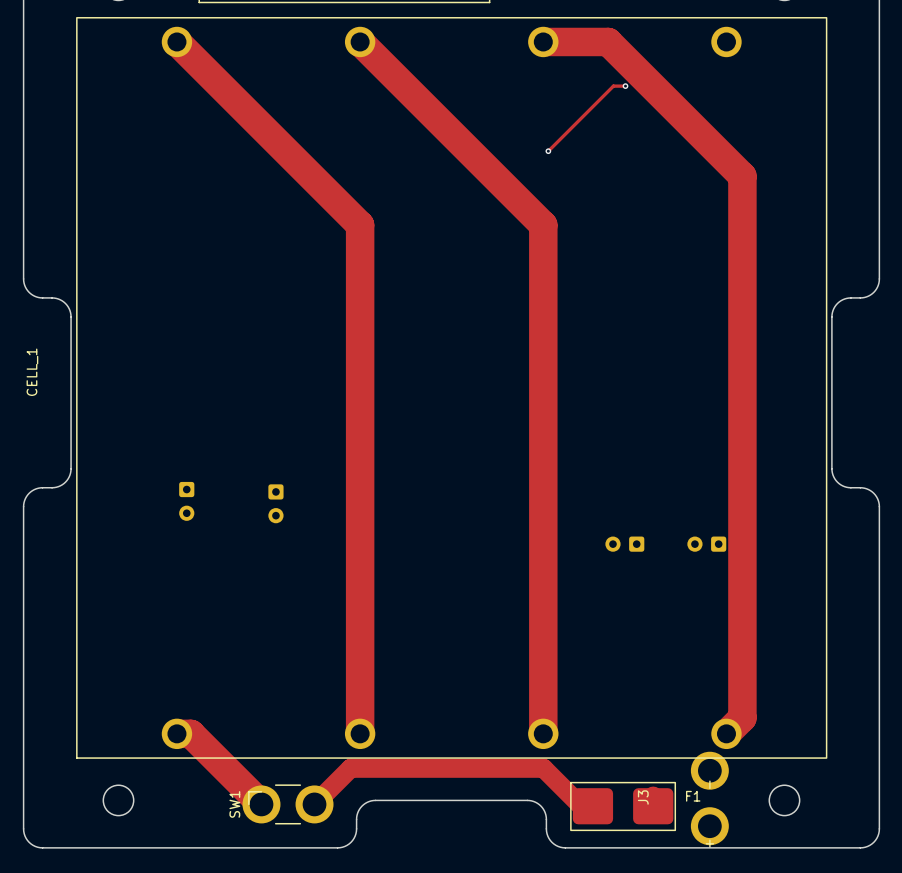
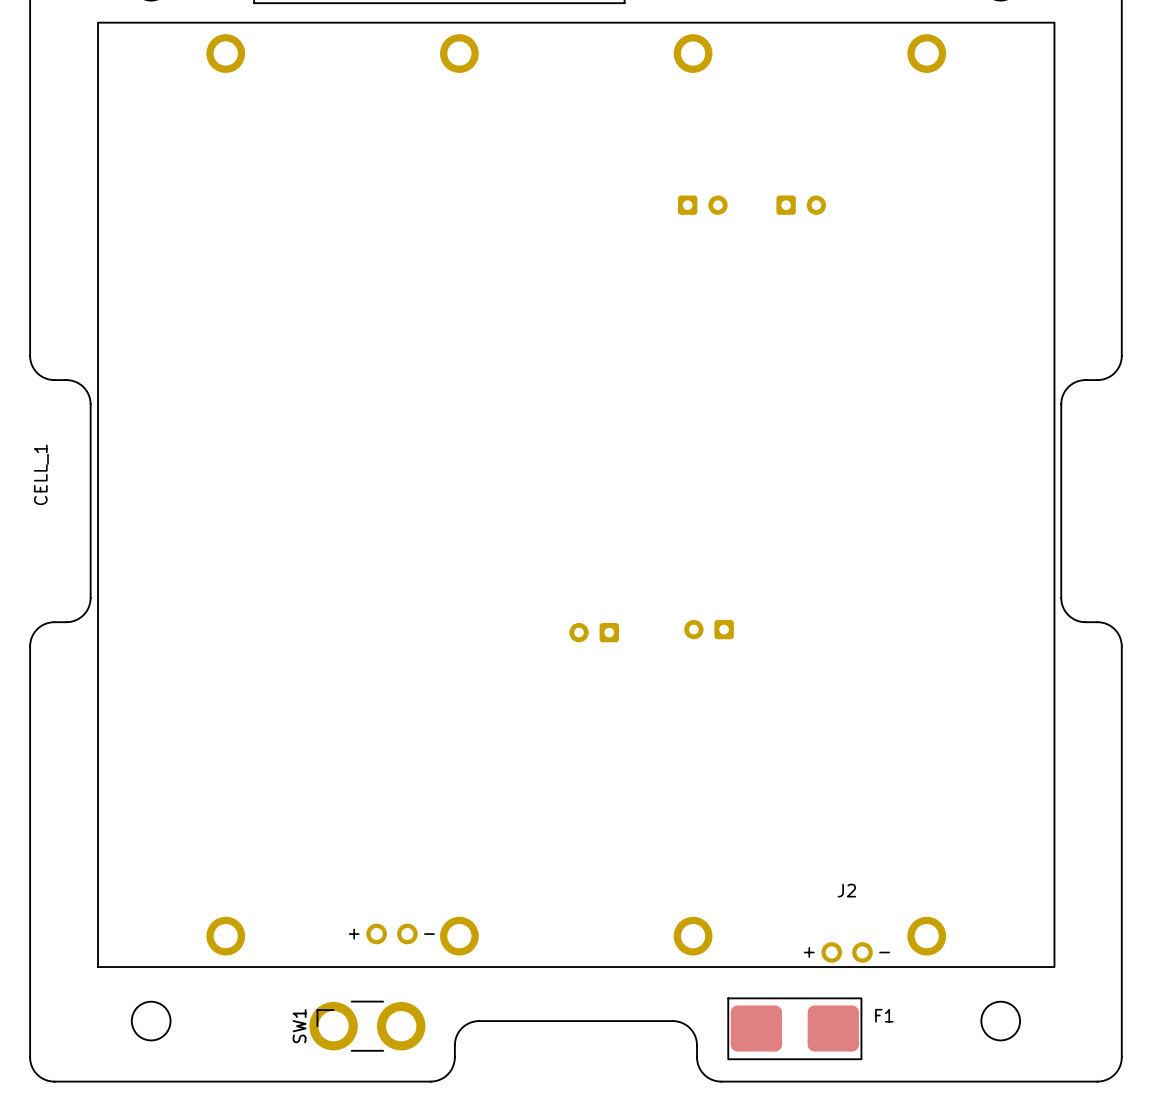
track: (176, 41) (360, 225) (360, 733) -> none
track: (360, 41) (543, 225) (543, 733) -> none
track: (543, 41) (608, 41) (742, 176) (742, 717) (726, 733) -> none
track: (625, 86) (613, 86) (548, 151) -> none
via: (625, 86) -> none
via: (548, 151) -> none
part: none -> (702, 205)
part: none -> (801, 205)
part: none -> (708, 629)
part: none -> (594, 632)
part: (186, 501) -> none
part: (275, 503) -> none
part: (624, 544) -> none
part: (706, 544) -> none
part: none -> (392, 934)
track: (176, 733) (190, 733) (261, 804) -> none
J2: none -> (847, 952)
J3: (709, 798) -> none
track: (314, 804) (350, 768) (543, 768) (581, 806) (592, 806) -> none

